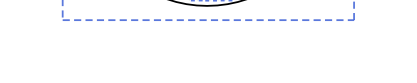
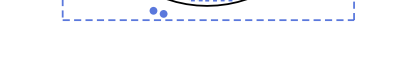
part: none -> (153, 10)
part: none -> (163, 13)

